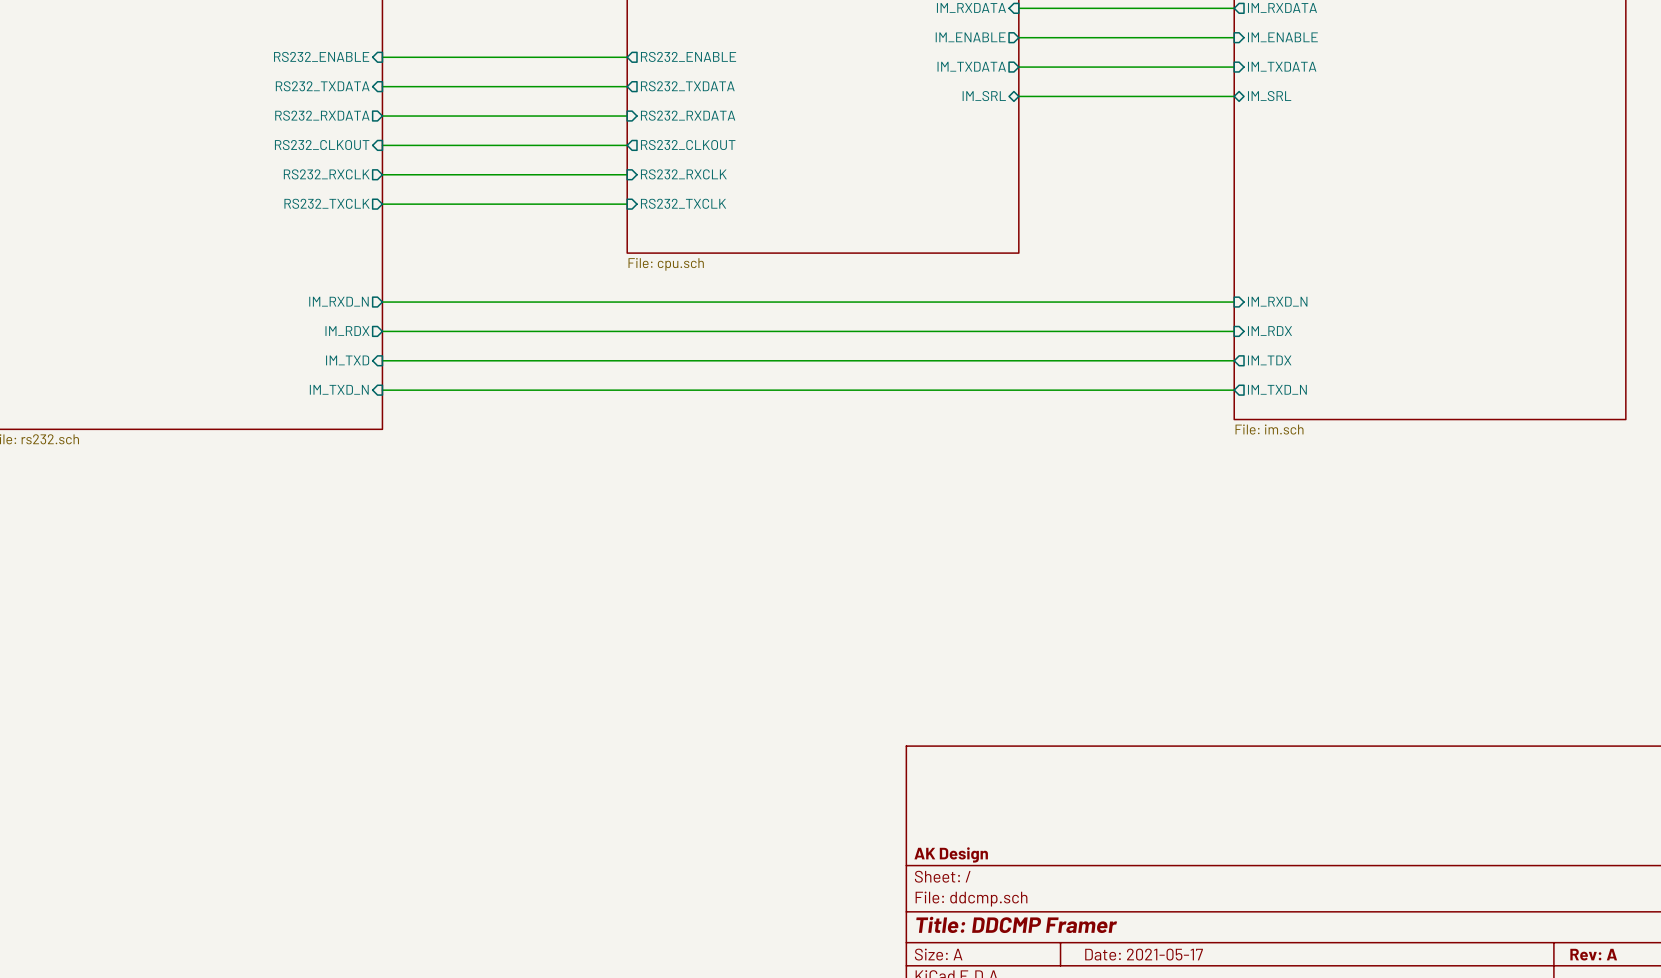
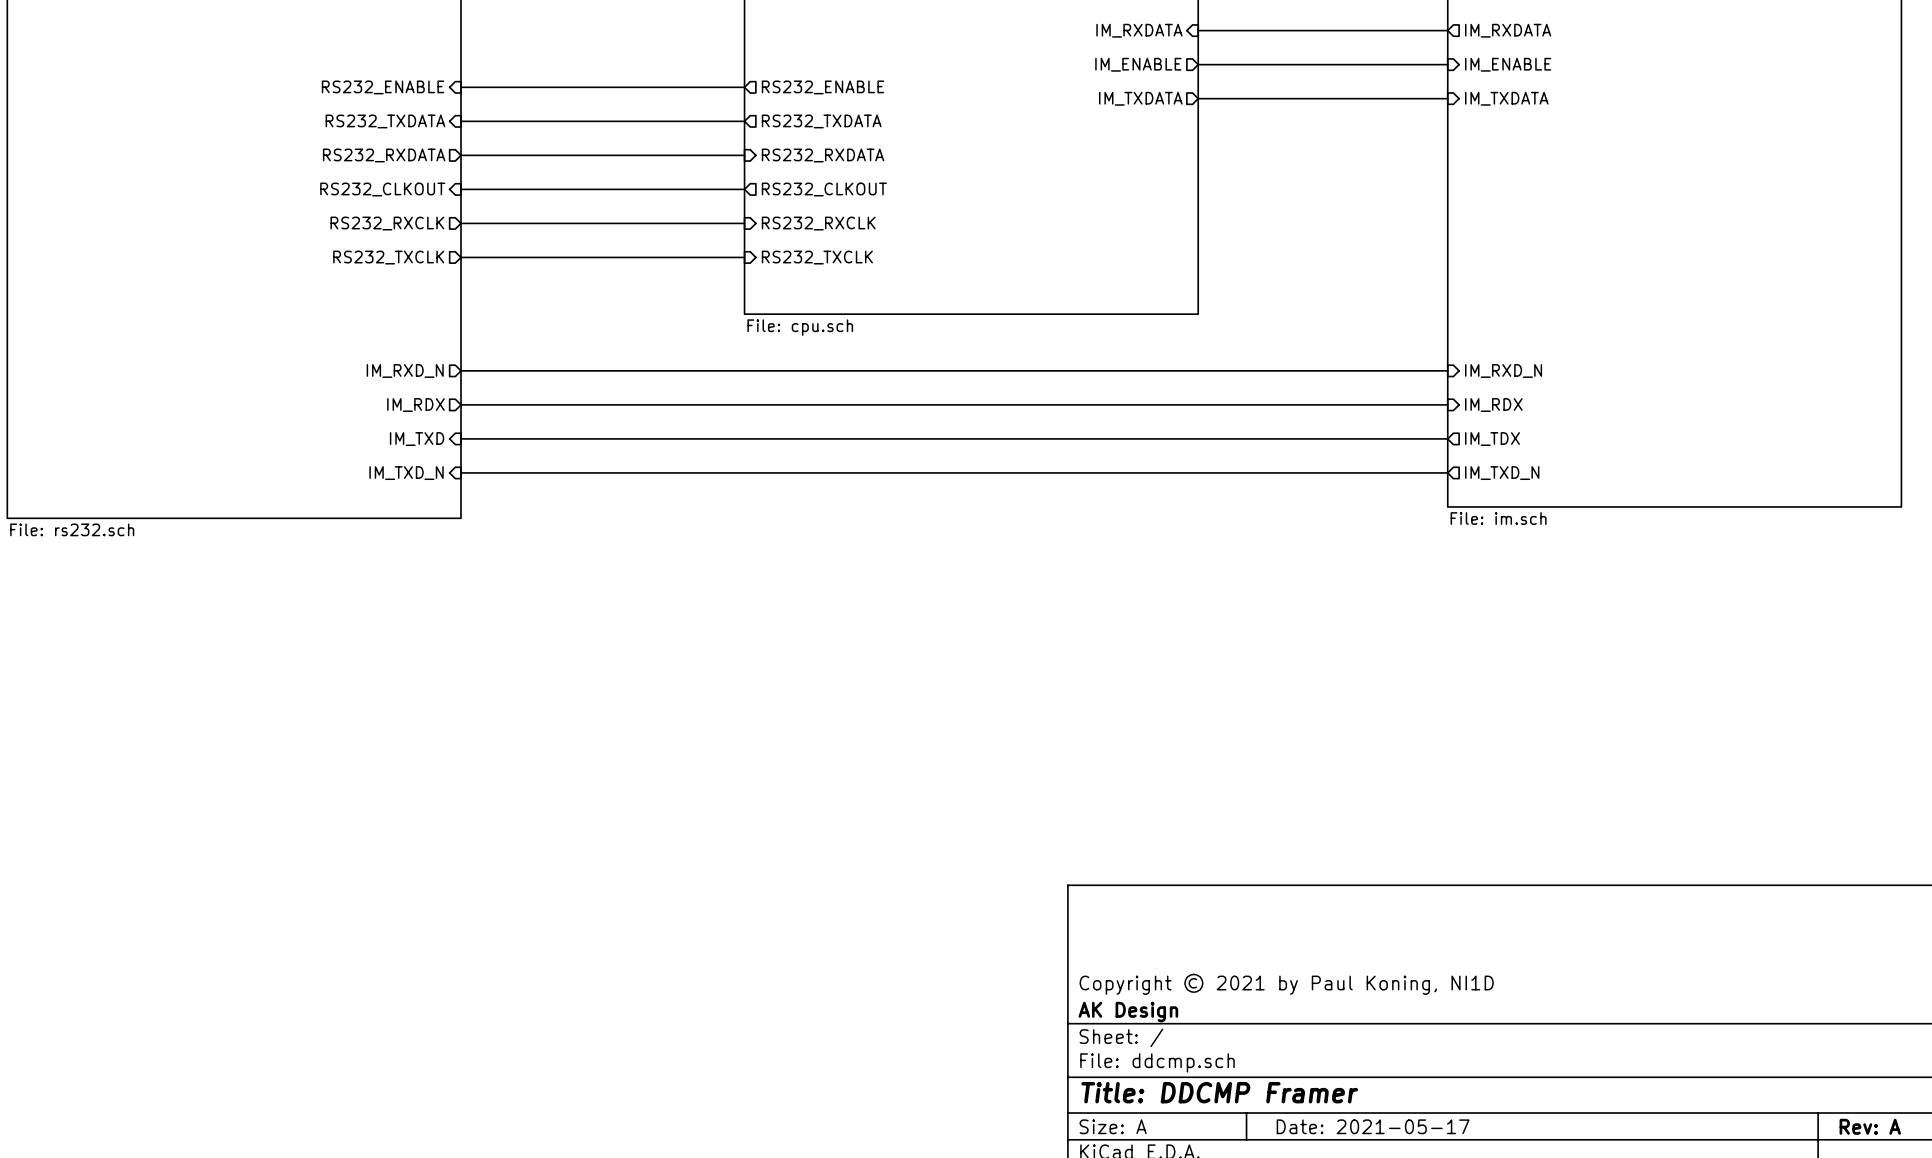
sheet pin: IM_SRL (984, 96) -> none
wire: (1018, 96) (1234, 96) -> none
sheet pin: IM_SRL (1269, 96) -> none
title block: none -> Copyright © 2021 by Paul Koning, NI1D (1286, 984)

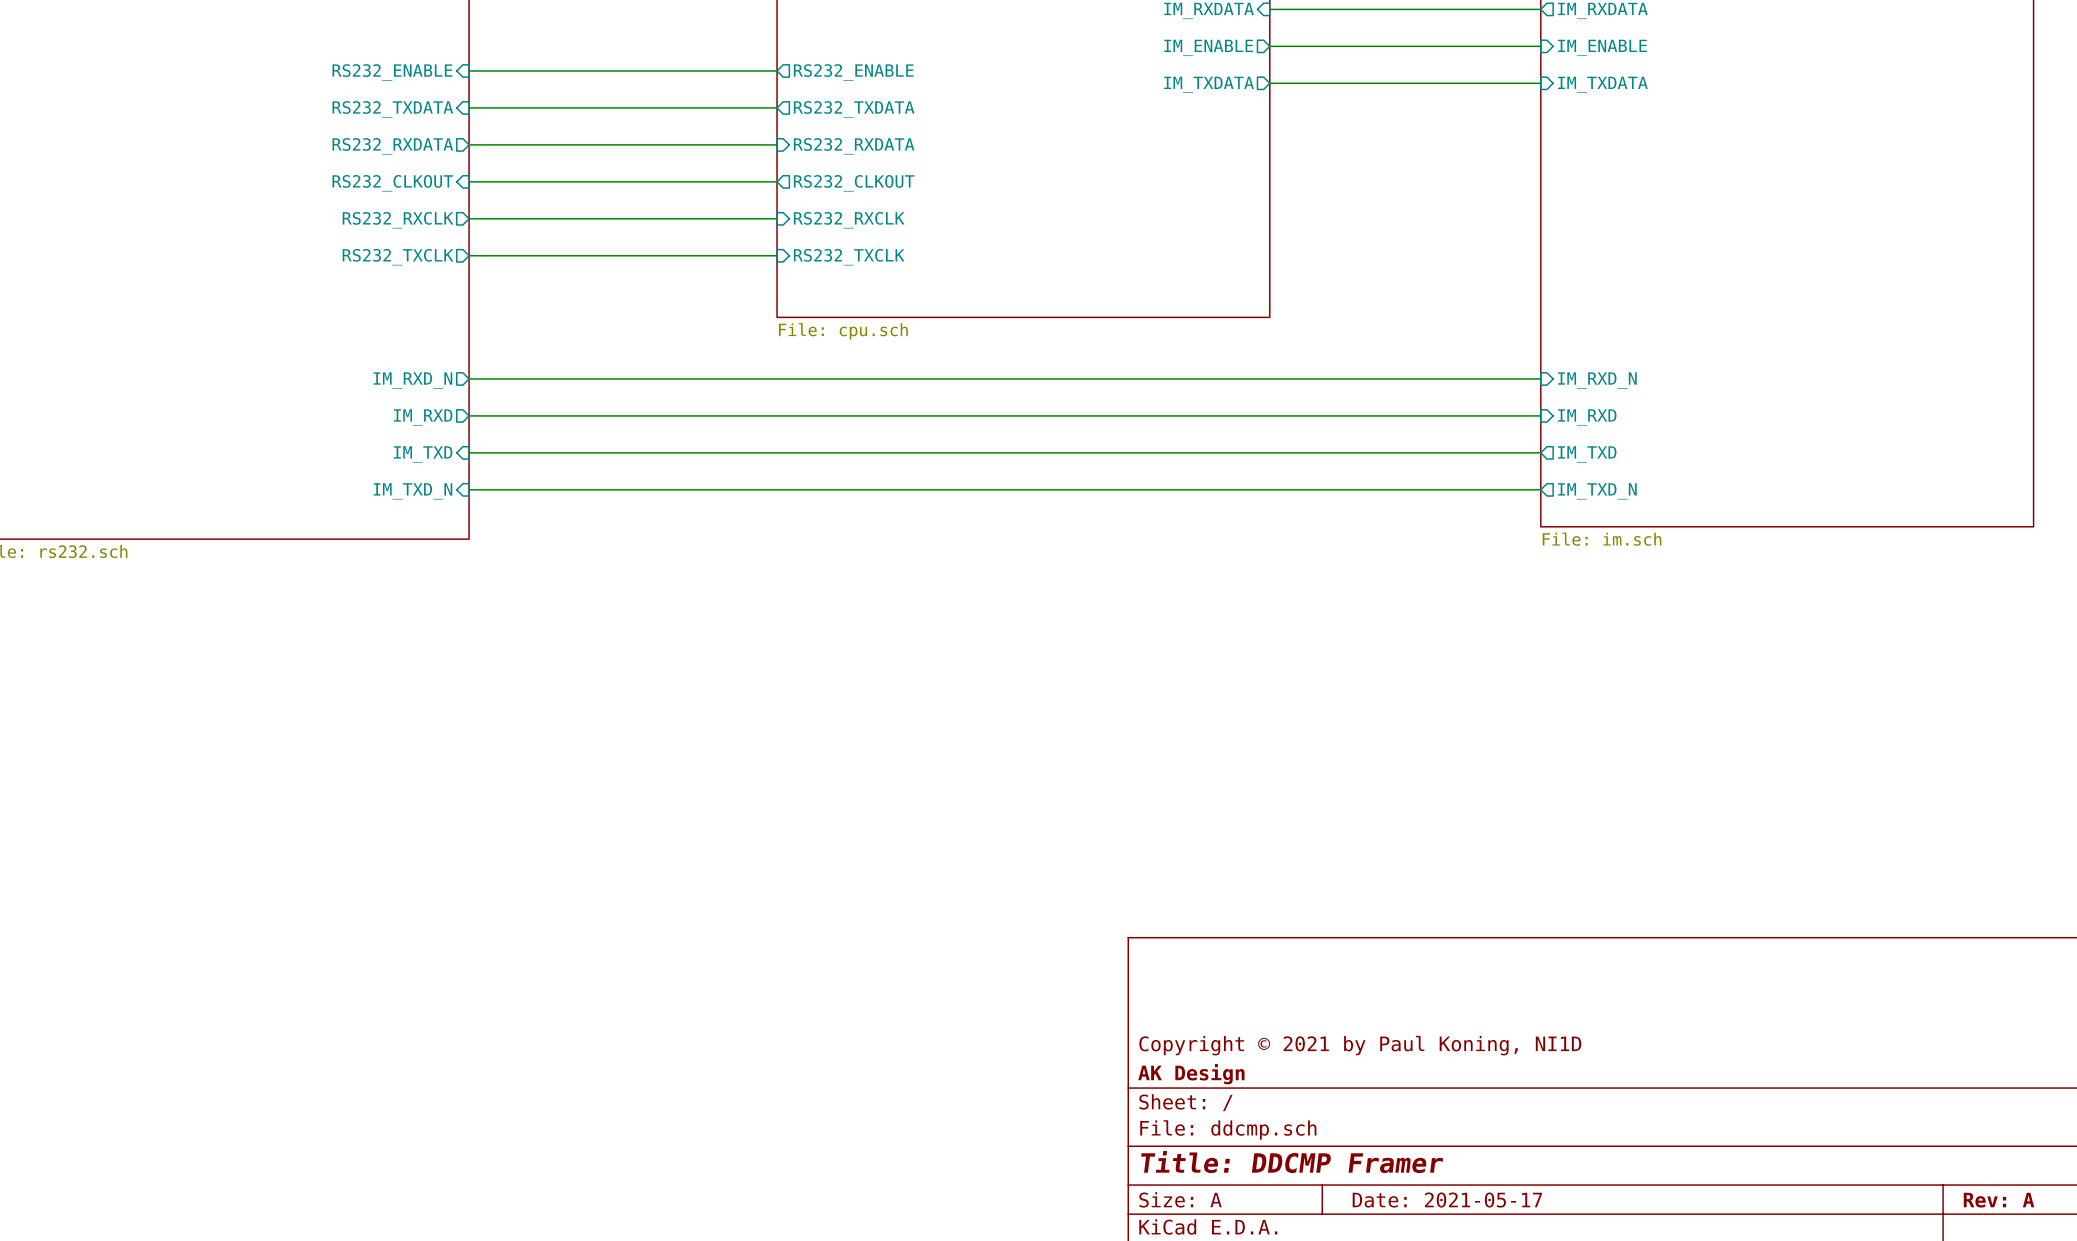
sheet pin: IM_RDX (415, 405) -> IM_RXD (423, 417)
sheet pin: IM_RDX (1493, 405) -> IM_RXD (1587, 417)
sheet pin: IM_TDX (1492, 439) -> IM_TXD (1587, 454)

